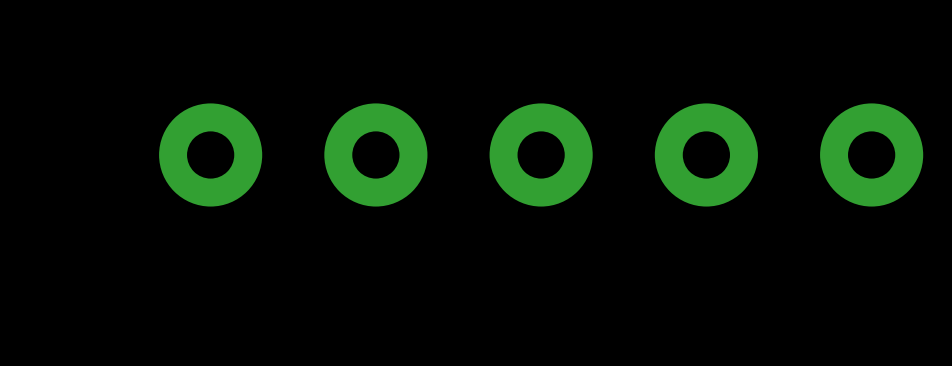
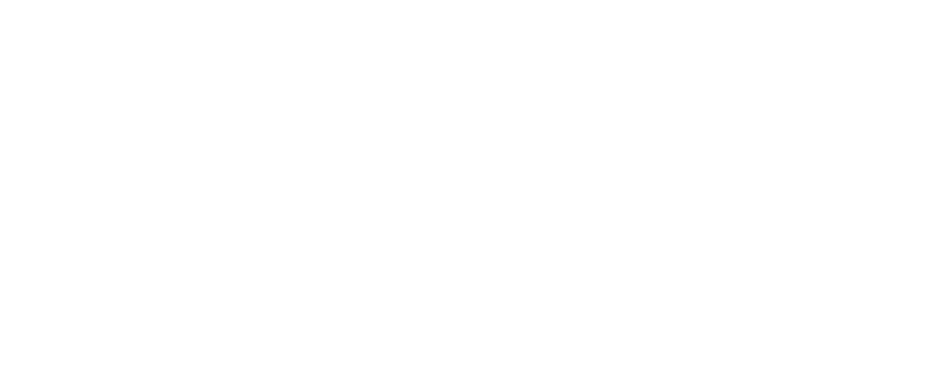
part: (541, 154) -> none

